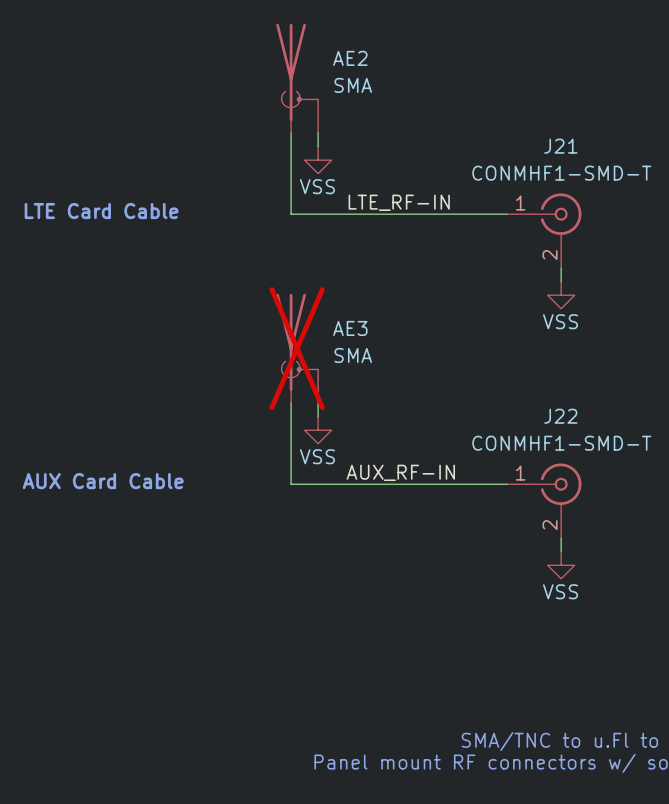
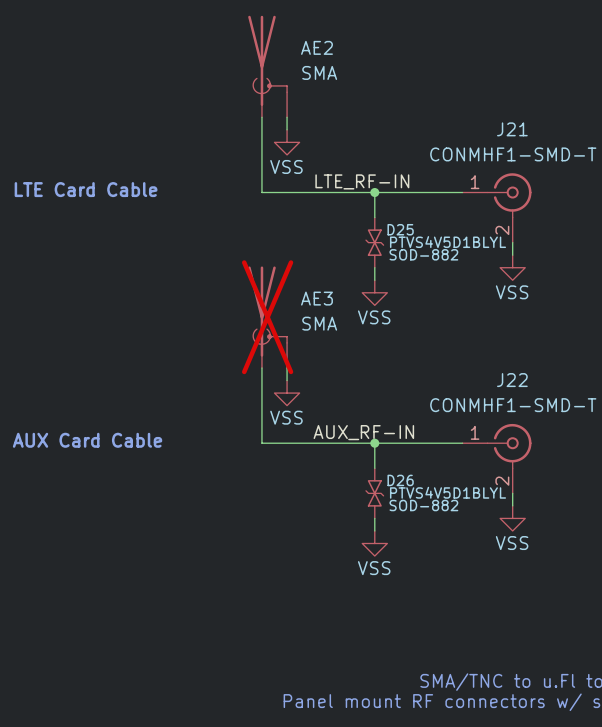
wire: none -> (374, 192) (374, 217)
junction: none -> (374, 192)
D25: none -> PTVS4V5D1BLYL (374, 242)
wire: none -> (374, 267) (374, 280)
power symbol: none -> VSS (374, 292)
wire: none -> (374, 443) (374, 468)
junction: none -> (374, 443)
D26: none -> PTVS4V5D1BLYL (374, 493)
wire: none -> (374, 518) (374, 530)
power symbol: none -> VSS (374, 543)

